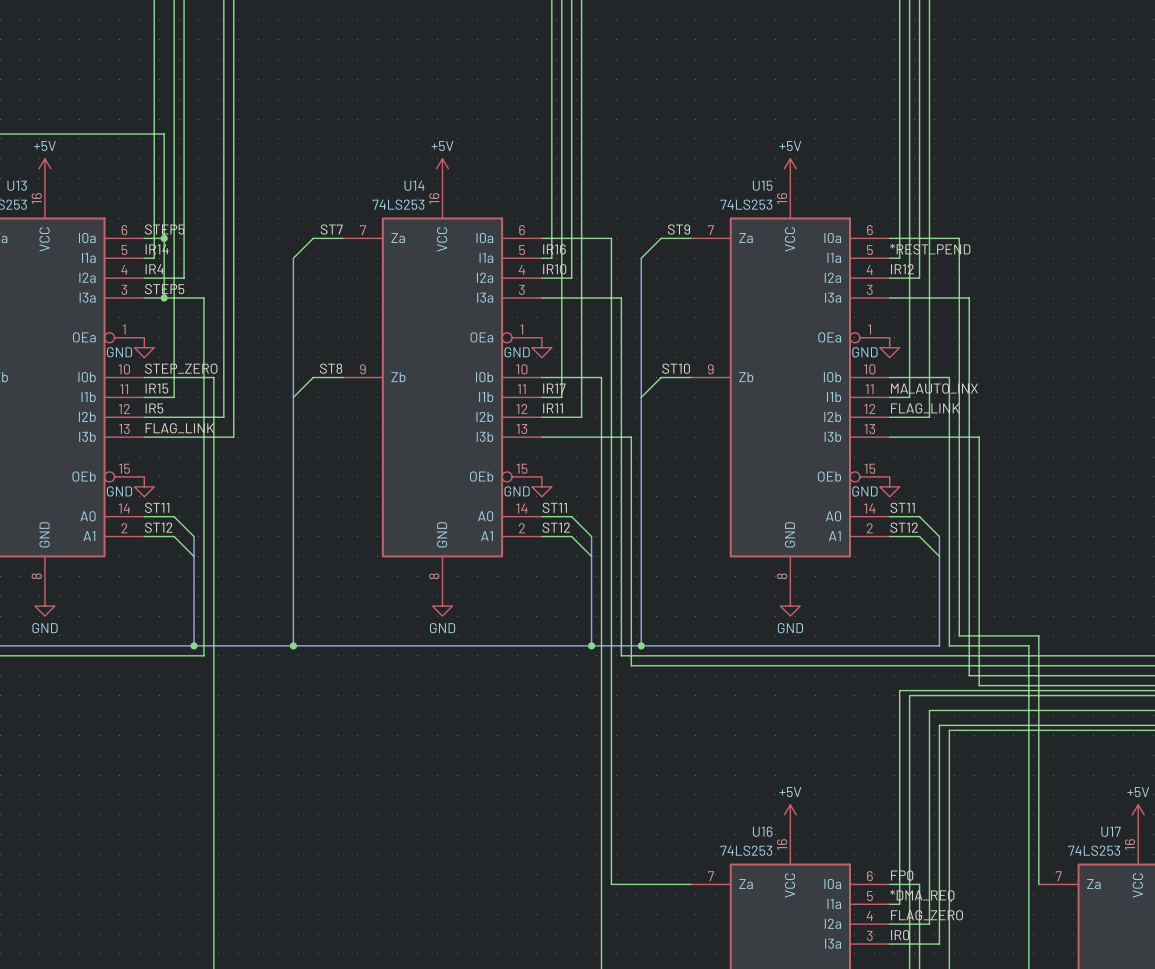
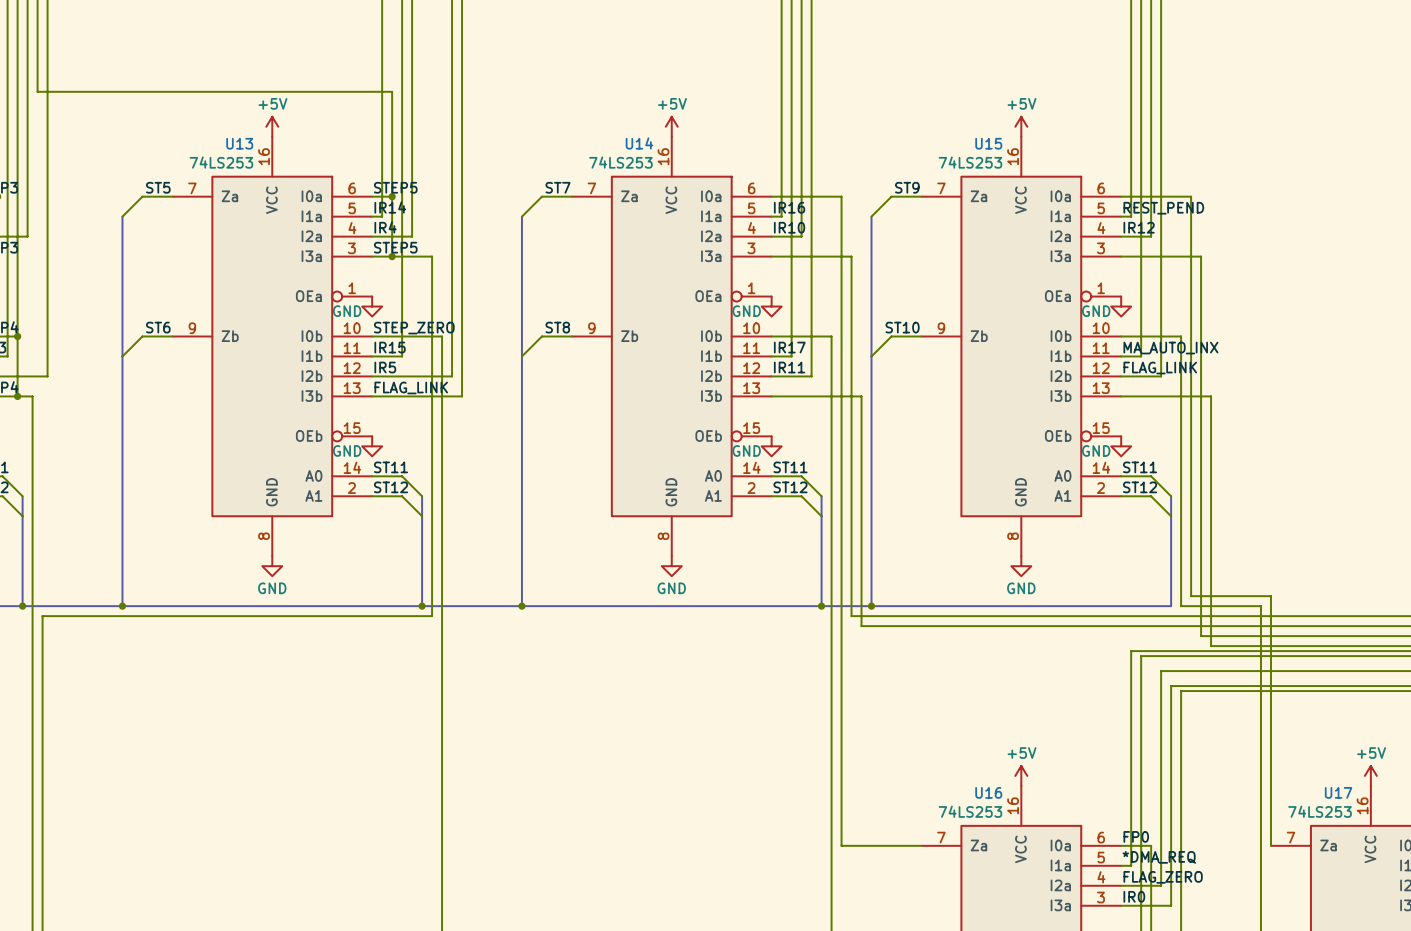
label: *REST_PEND (930, 249) -> REST_PEND (1163, 208)

